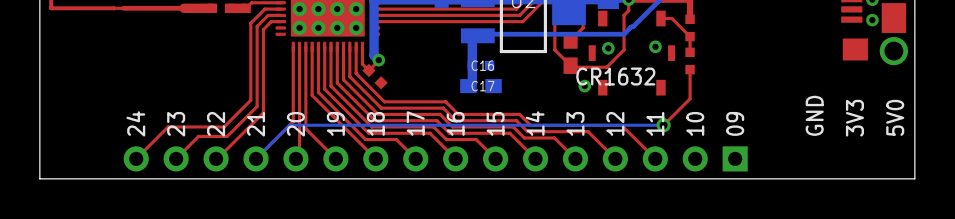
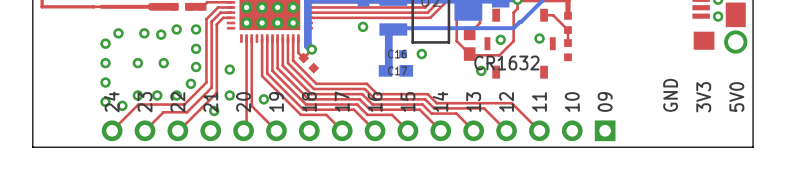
via: none -> (363, 26)
via: none -> (176, 29)
via: none -> (196, 29)
via: none -> (118, 33)
via: none -> (144, 33)
via: none -> (161, 34)
top track: (293, 46) (293, 121) (256, 158) -> none
top track: (312, 46) (312, 95) (333, 116) -> none
via: none -> (105, 43)
via: none -> (196, 48)
via: none -> (421, 54)
top track: (690, 69) (690, 98) (663, 125) -> none
via: none -> (105, 63)
via: none -> (137, 63)
via: none -> (163, 63)
via: none -> (196, 67)
via: none -> (229, 69)
via: none -> (105, 82)
via: none -> (190, 83)
via: none -> (137, 95)
via: none -> (157, 95)
via: none -> (176, 95)
via: none -> (229, 95)
top track: (333, 116) (375, 158) -> none
via: none -> (263, 99)
via: none -> (105, 101)
bottom track: (663, 125) (289, 125) (256, 158) -> none
via: (663, 125) -> none
via: none -> (122, 105)
via: none -> (214, 110)

